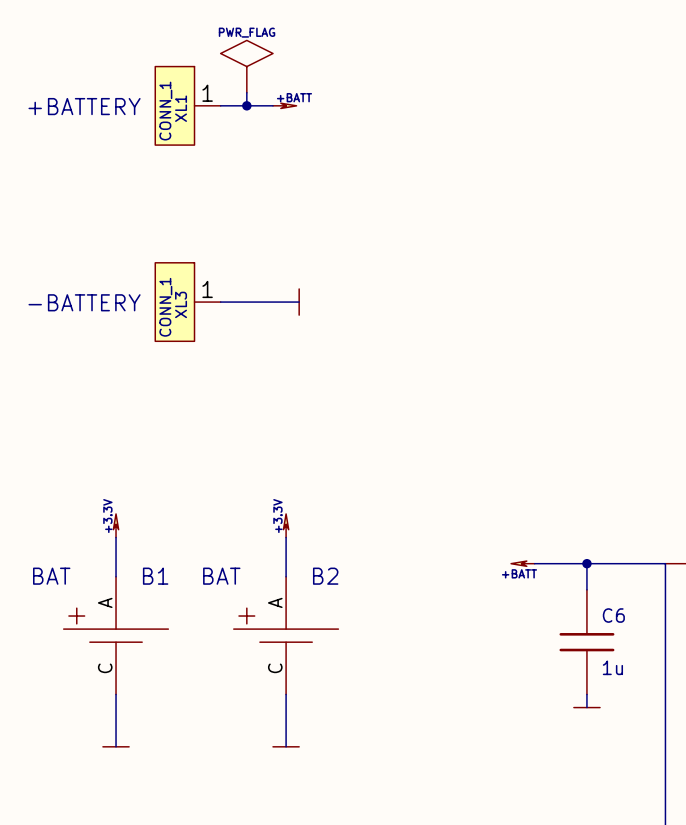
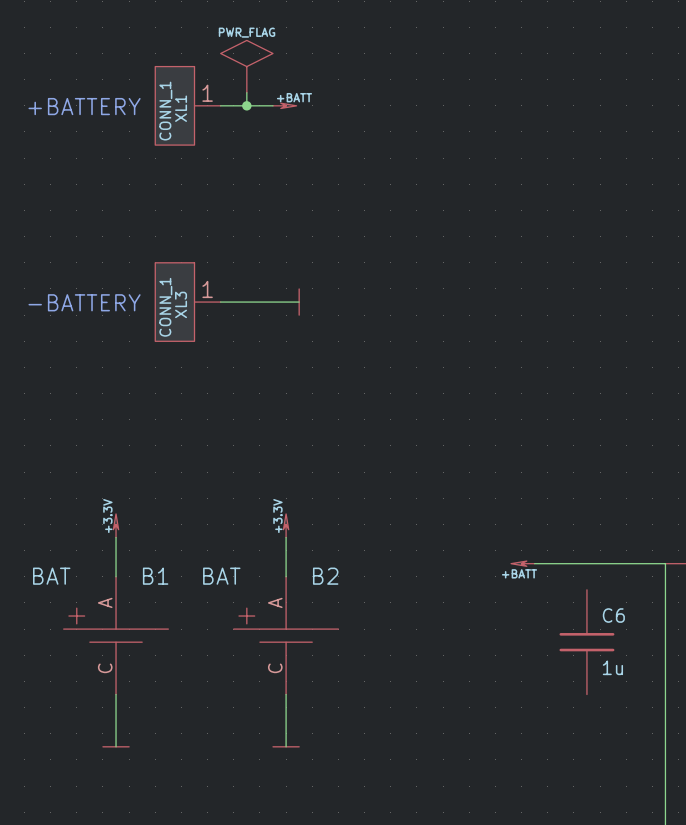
wire: (586, 563) (586, 589) -> none
junction: (586, 563) -> none
wire: (586, 694) (586, 707) -> none
power symbol: (586, 707) -> none

